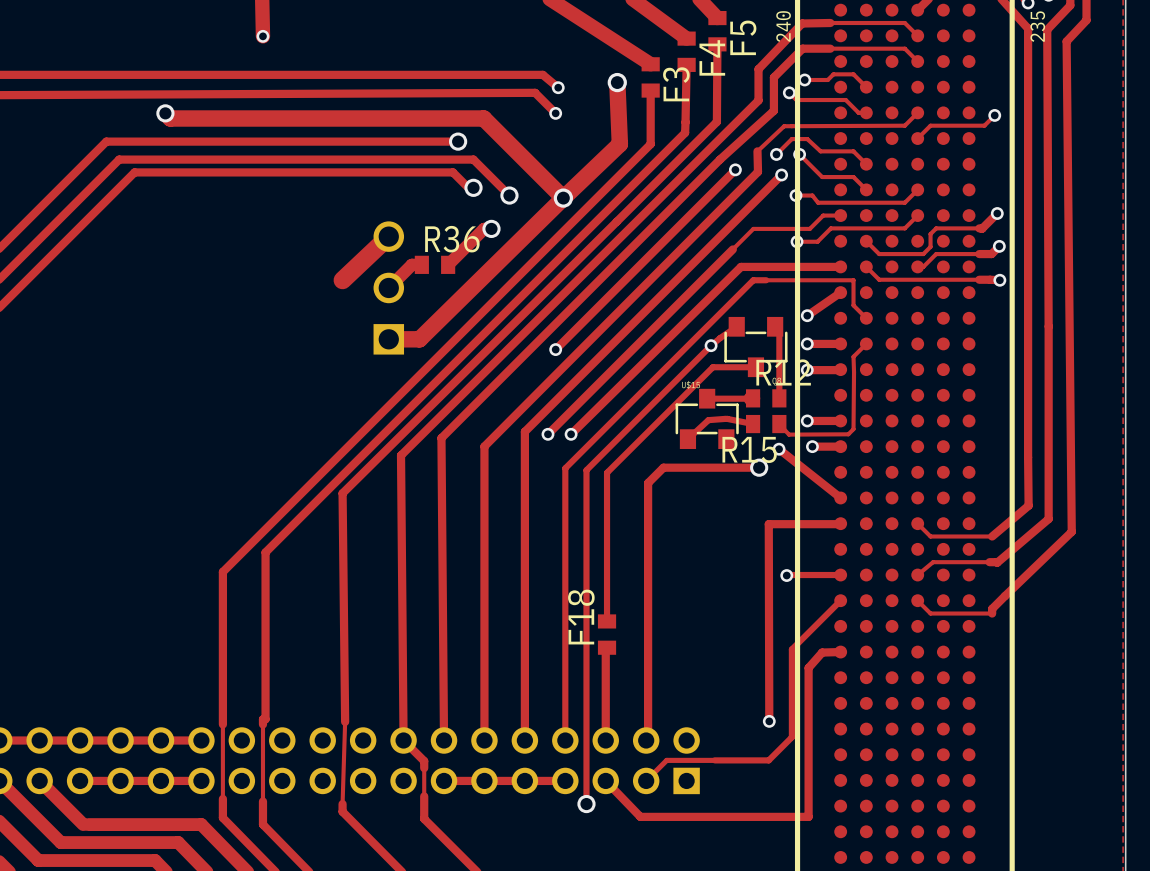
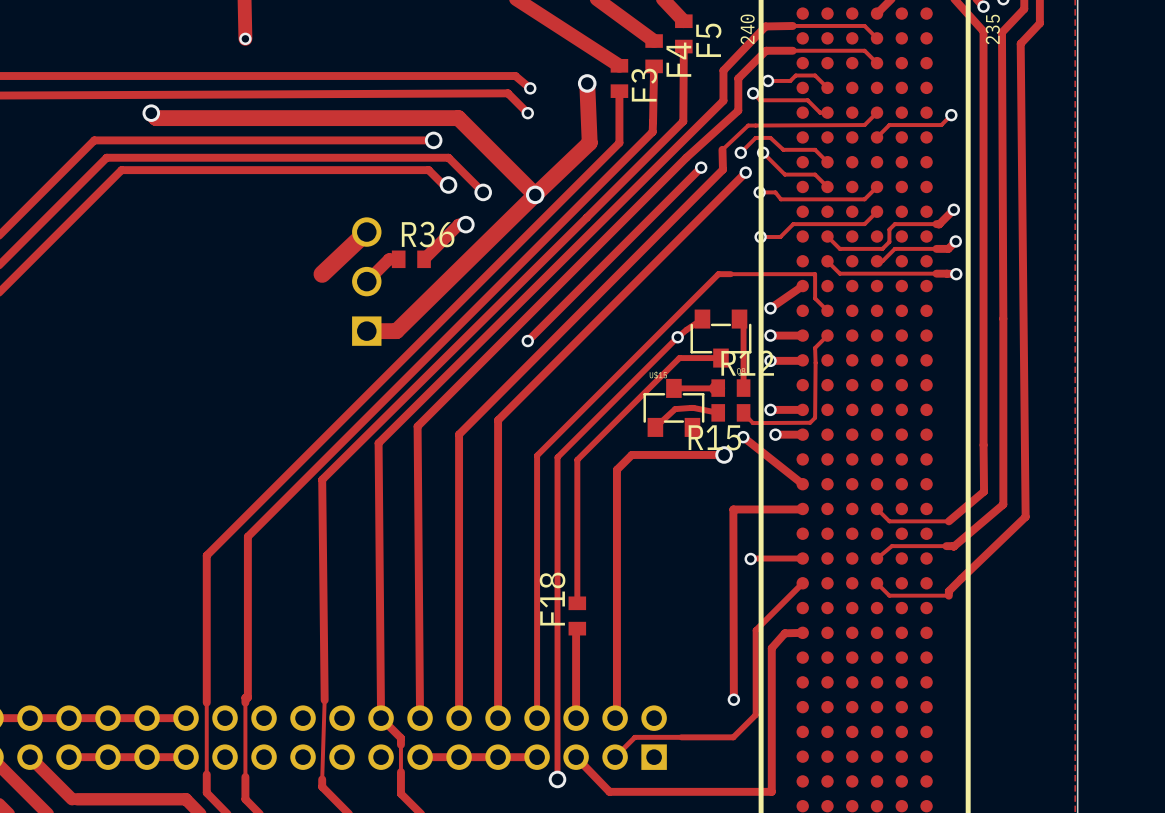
track: (840, 215) (823, 215) (809, 228) (753, 228) (547, 434) -> none
track: (840, 266) (741, 266) (571, 434) -> none
via: (547, 434) -> none
via: (571, 434) -> none

